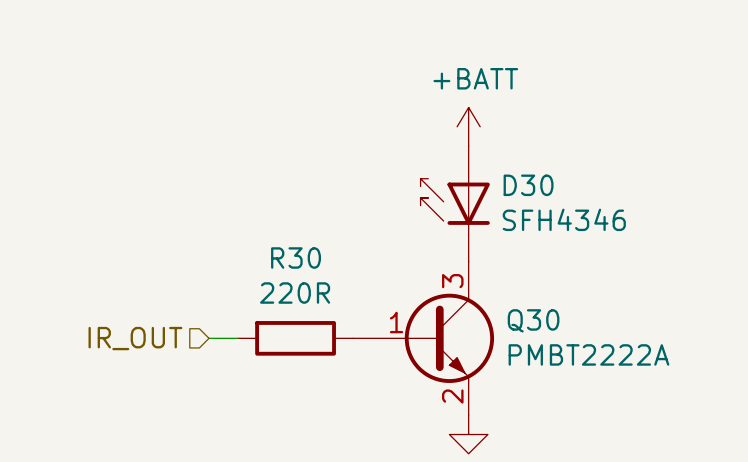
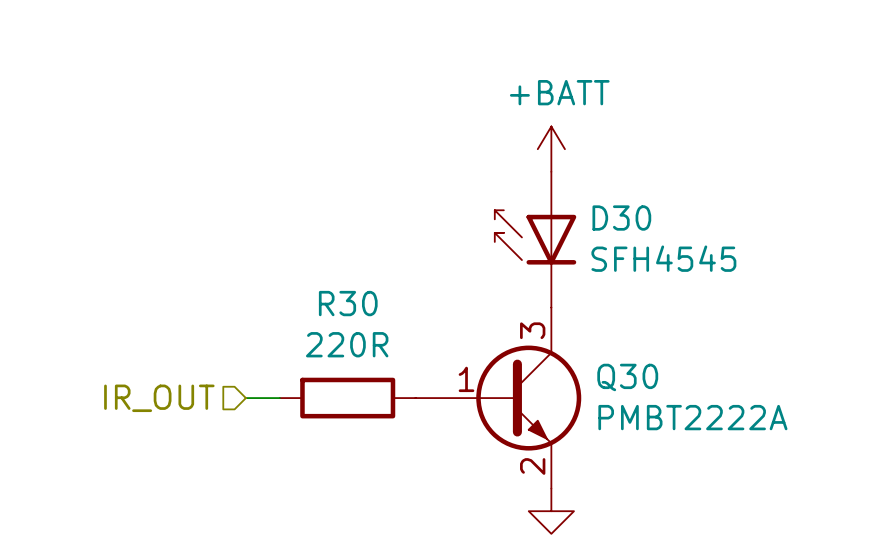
D30 value: SFH4346 (564, 219) -> SFH4545 (663, 258)

